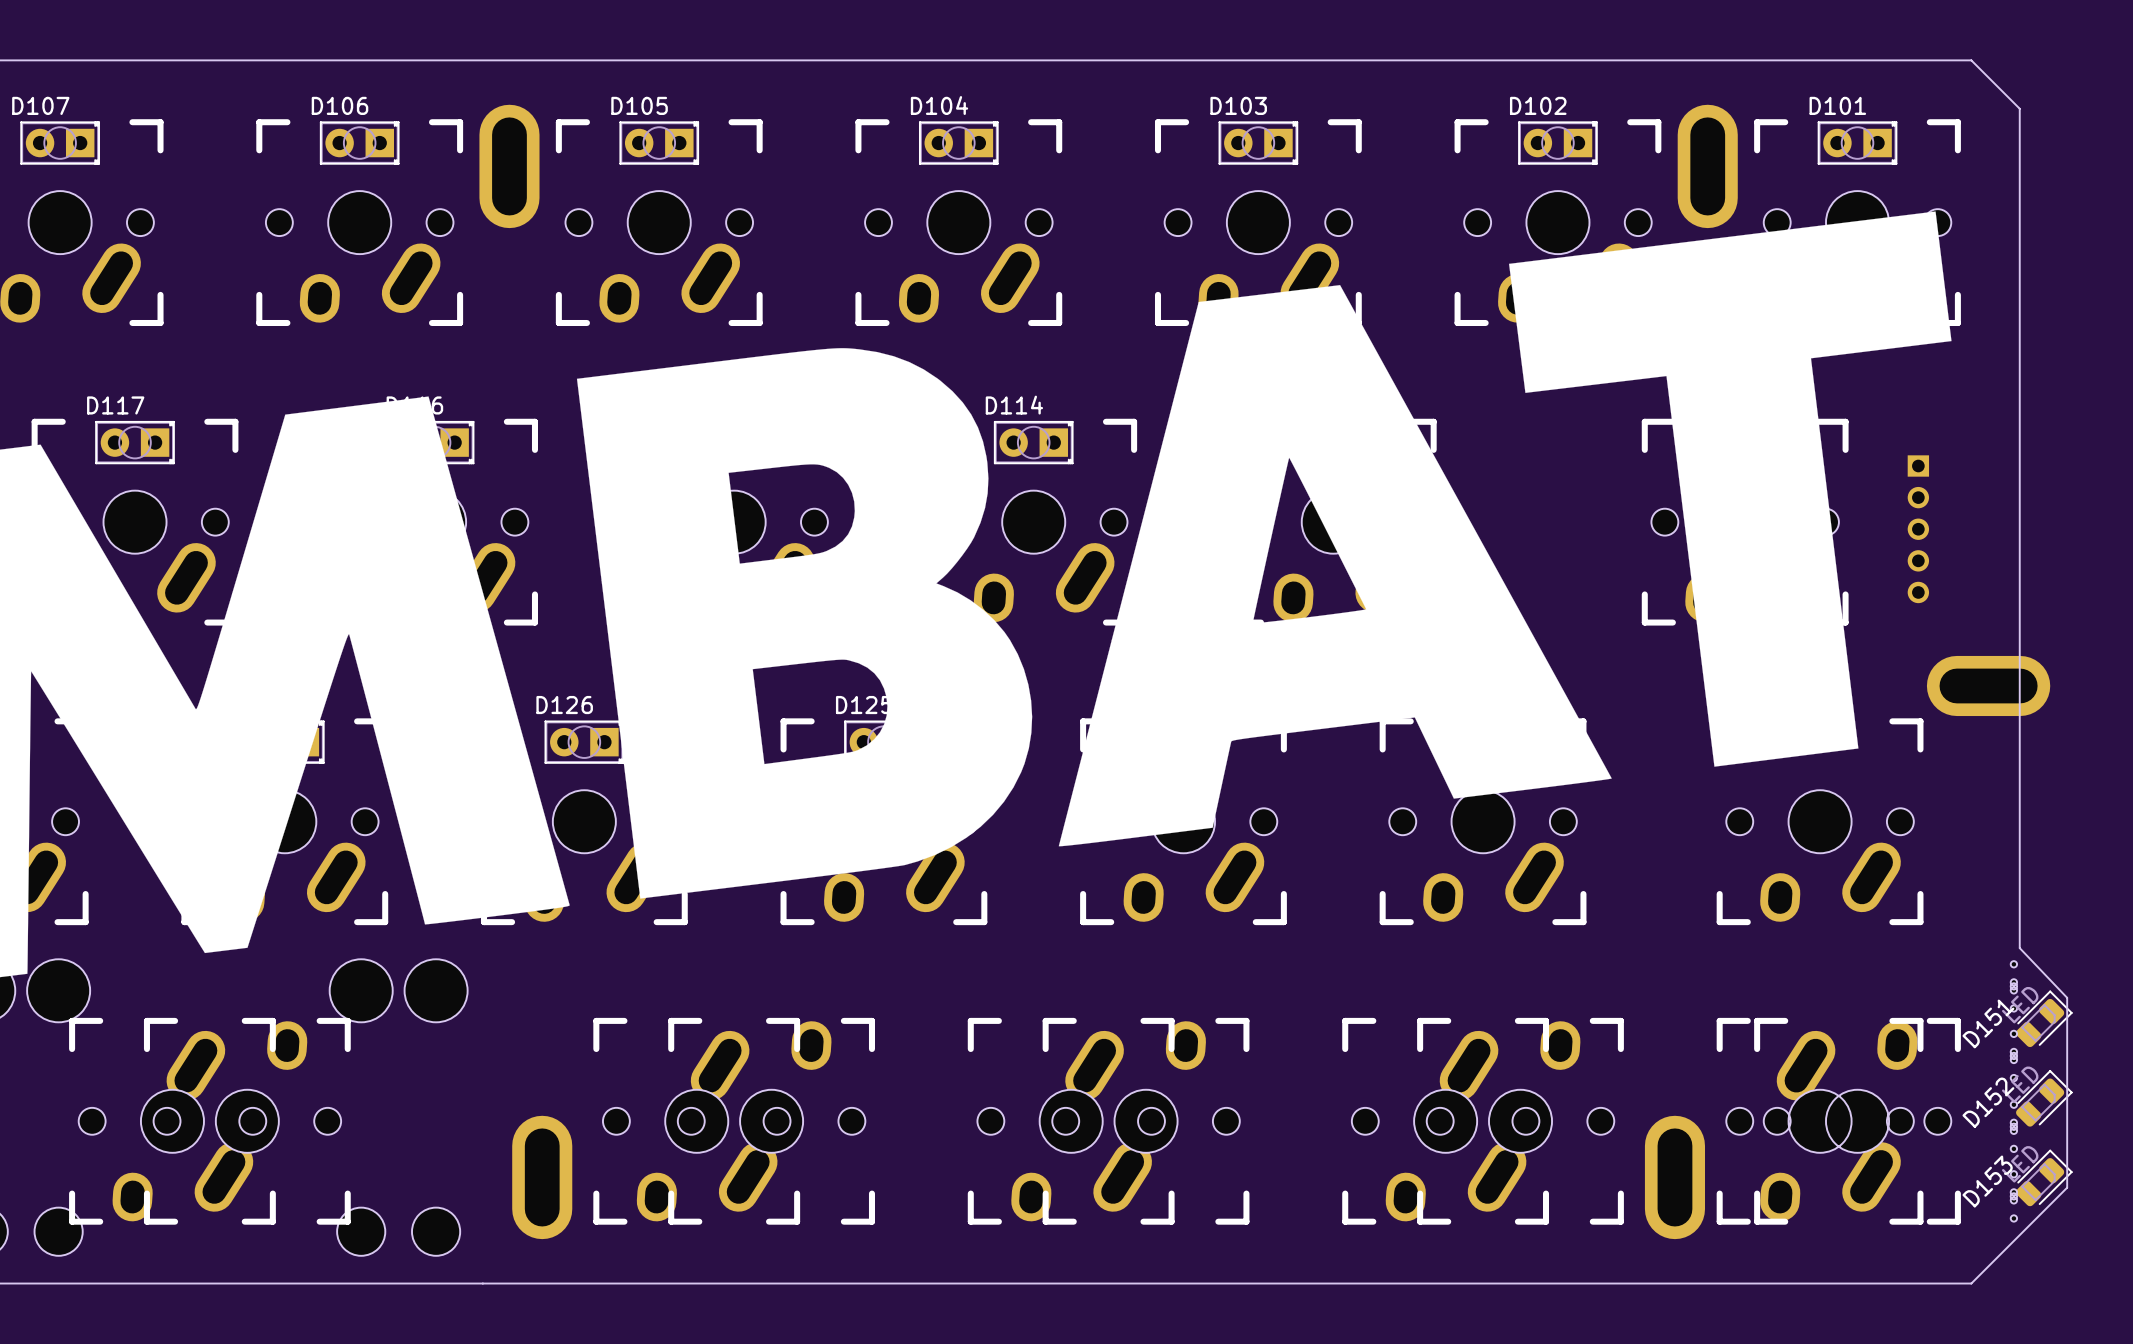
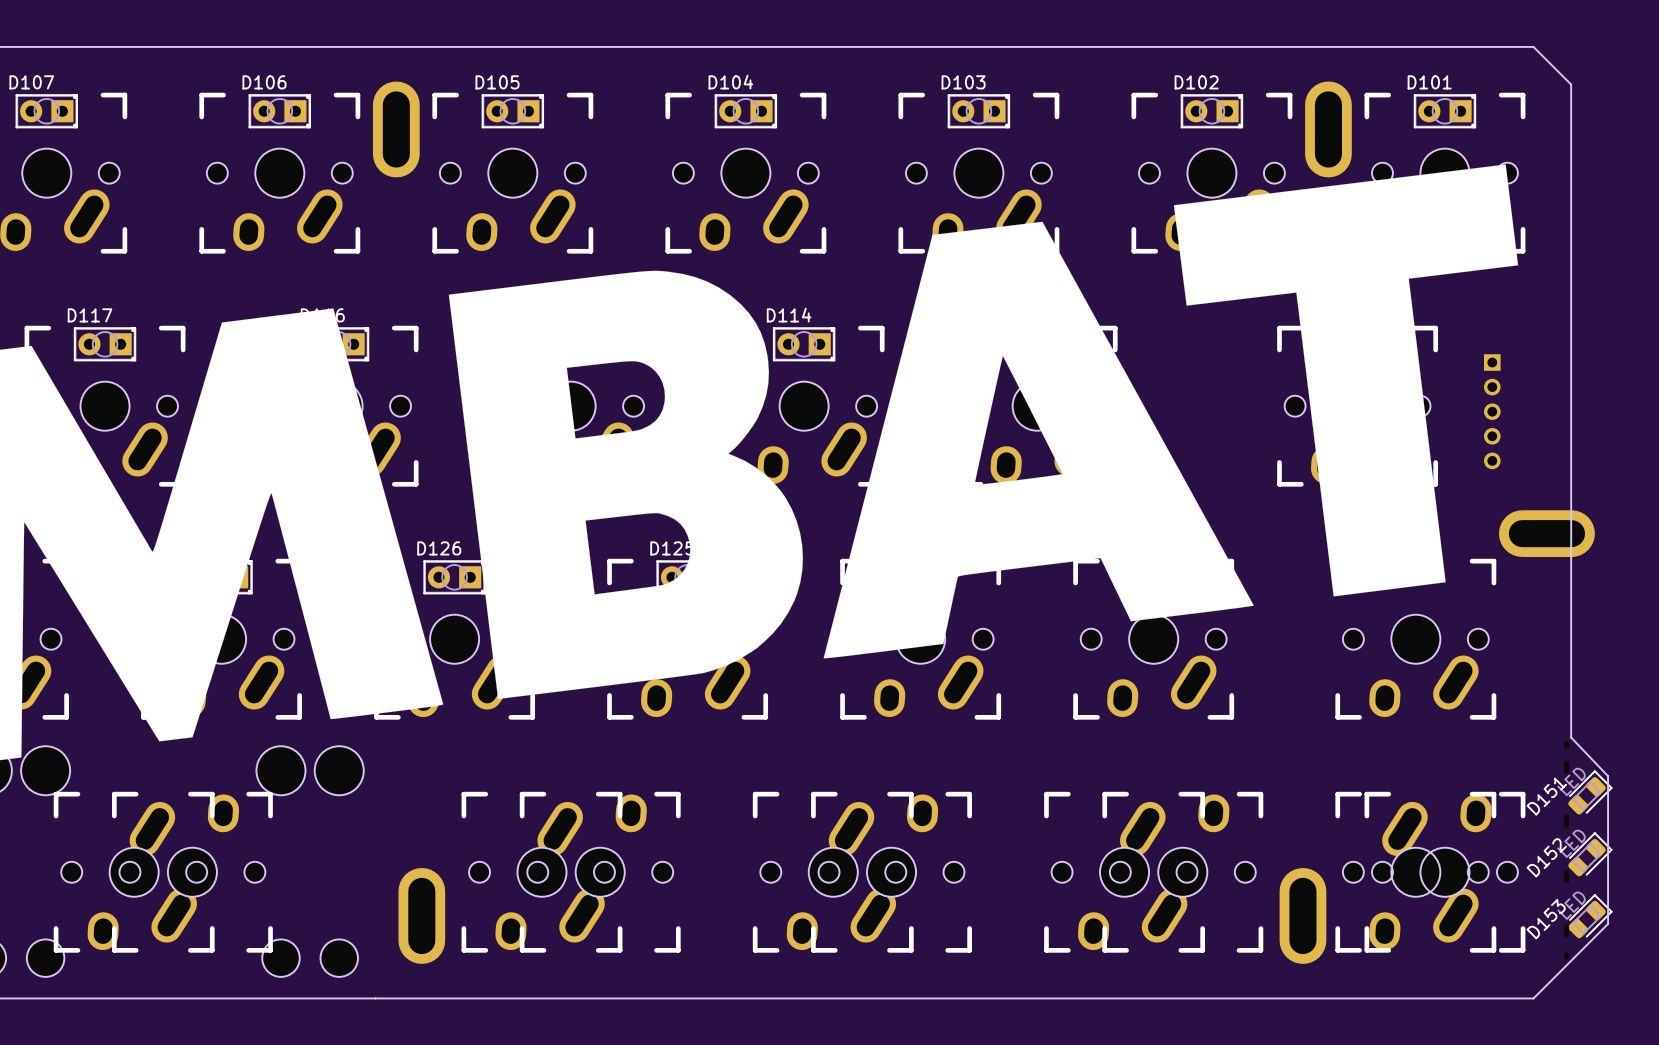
part: none -> (1566, 744)
part footprint: [2010, 961, 2018, 1012] -> [1564, 760, 1570, 775]
part footprint: [2010, 1030, 2018, 1082] -> [1564, 814, 1570, 829]
part footprint: [2010, 1101, 2018, 1153] -> [1564, 869, 1570, 884]
part footprint: [2010, 1171, 2018, 1222] -> [1564, 923, 1570, 938]
part: none -> (1566, 956)

